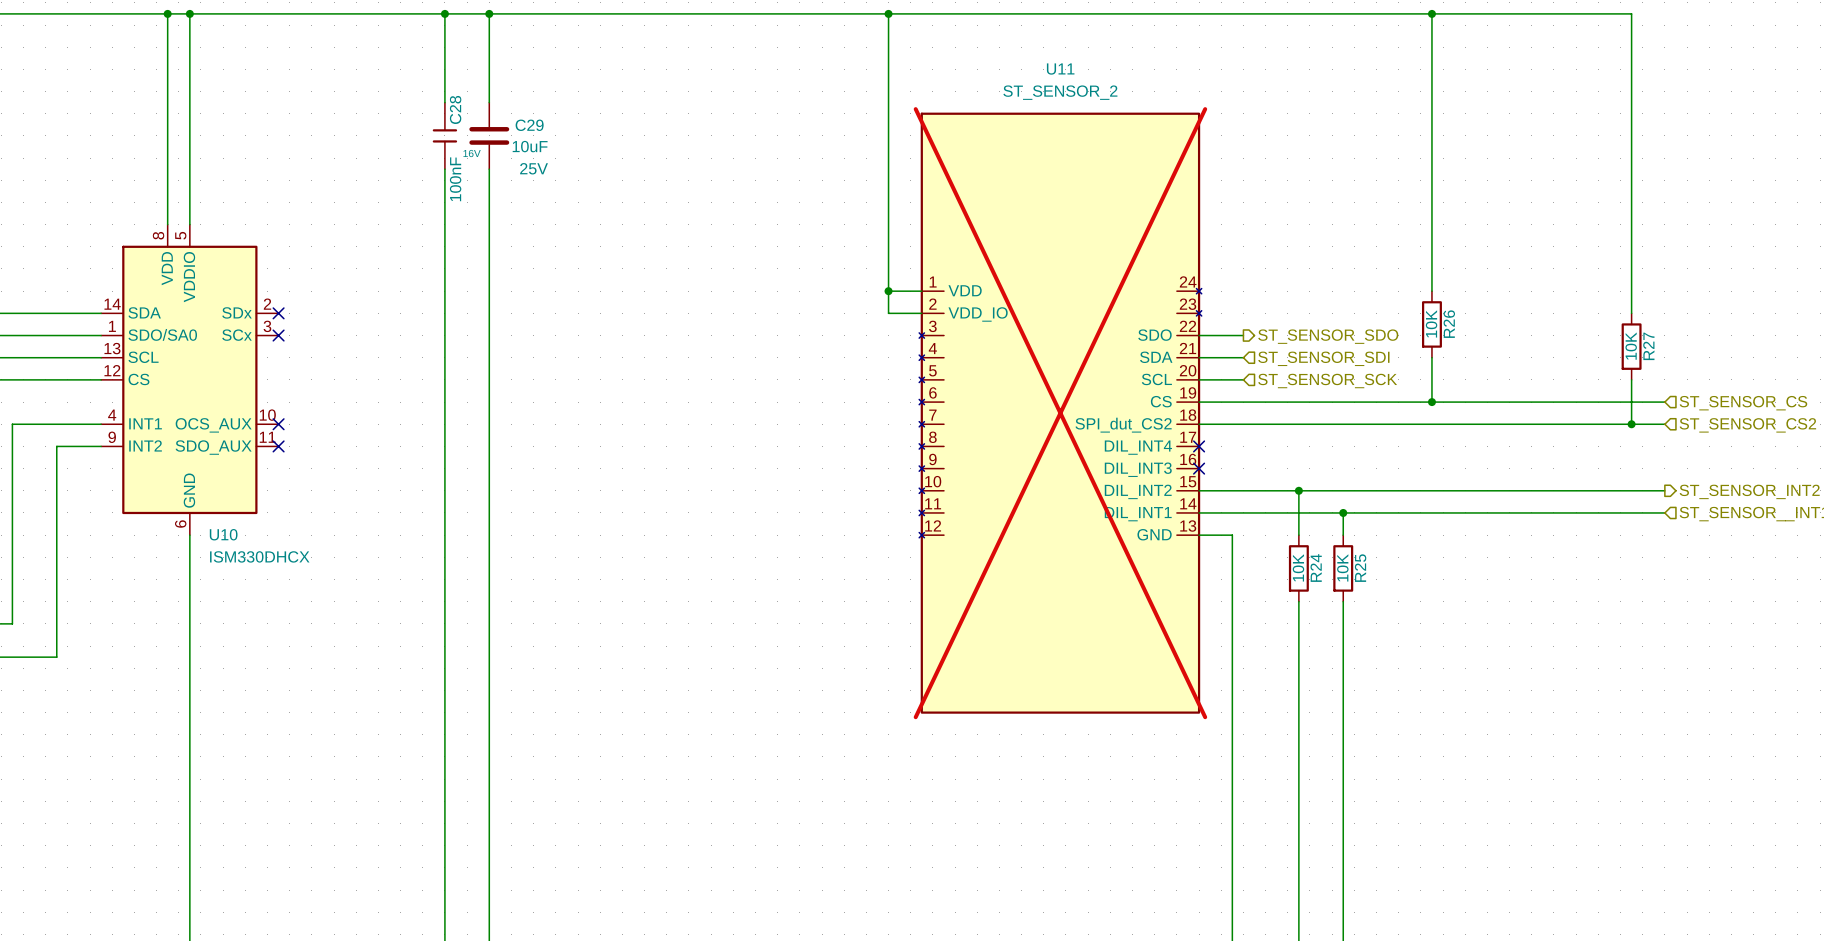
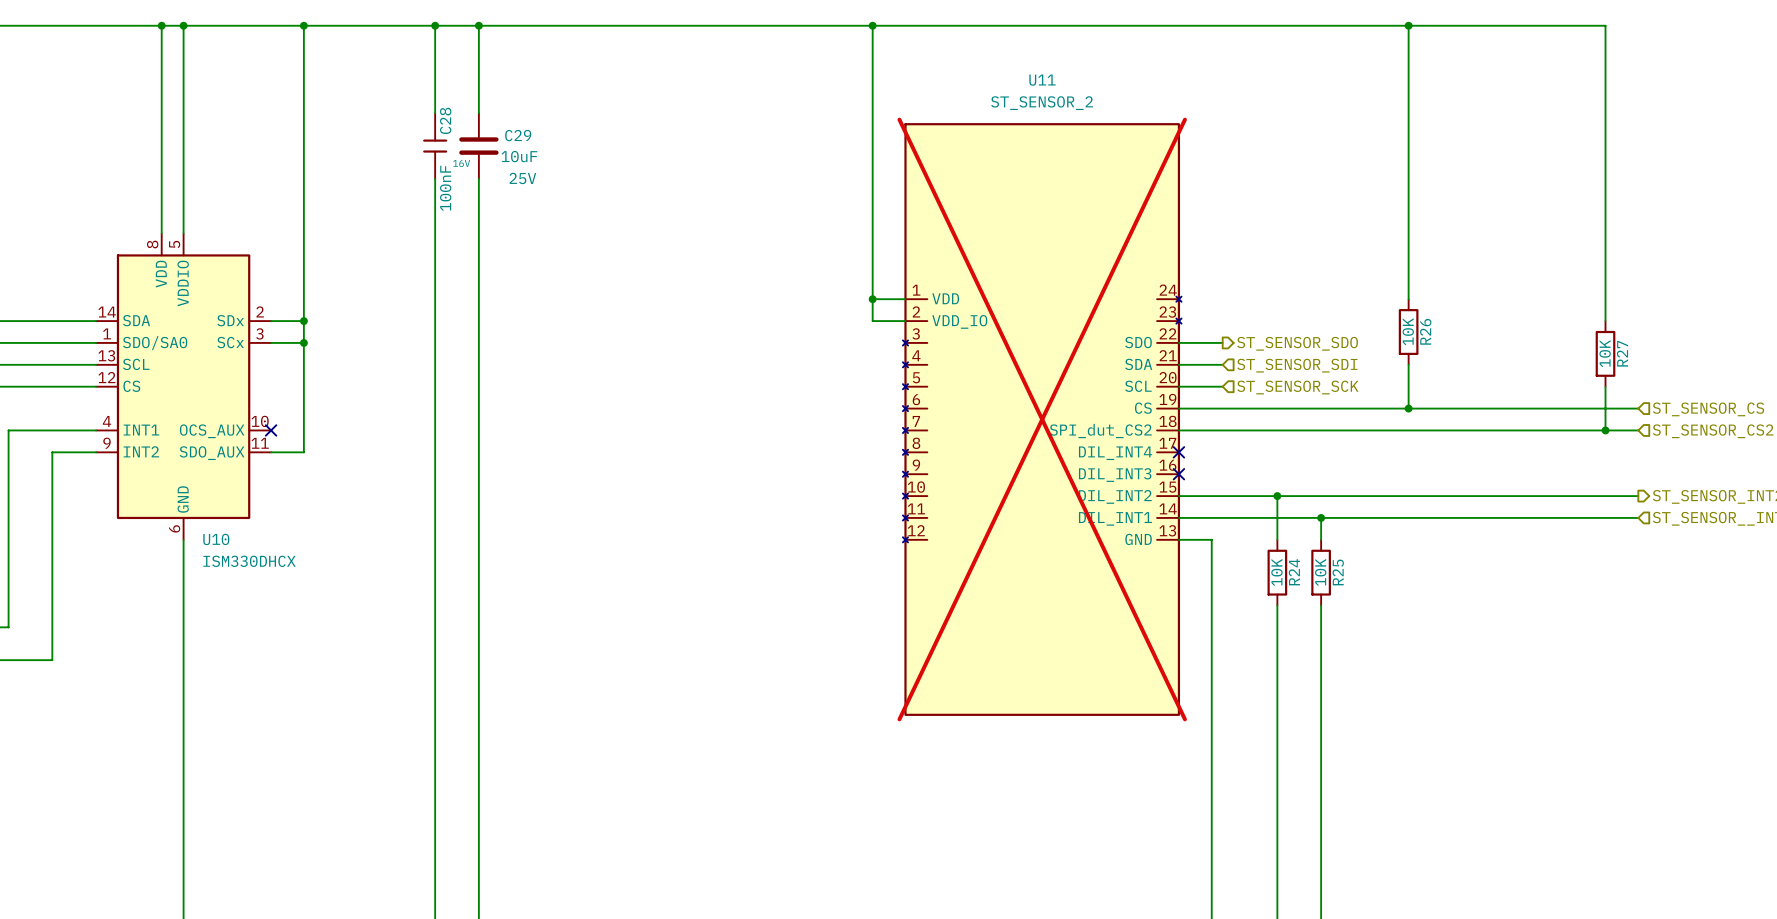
wire: none -> (303, 25) (303, 452) (271, 452)
junction: none -> (303, 25)
wire: none -> (271, 321) (303, 321)
no-connect mark: (278, 313) -> none
junction: none -> (303, 321)
wire: none -> (271, 342) (303, 342)
no-connect mark: (278, 335) -> none
junction: none -> (303, 342)
no-connect mark: (278, 446) -> none

